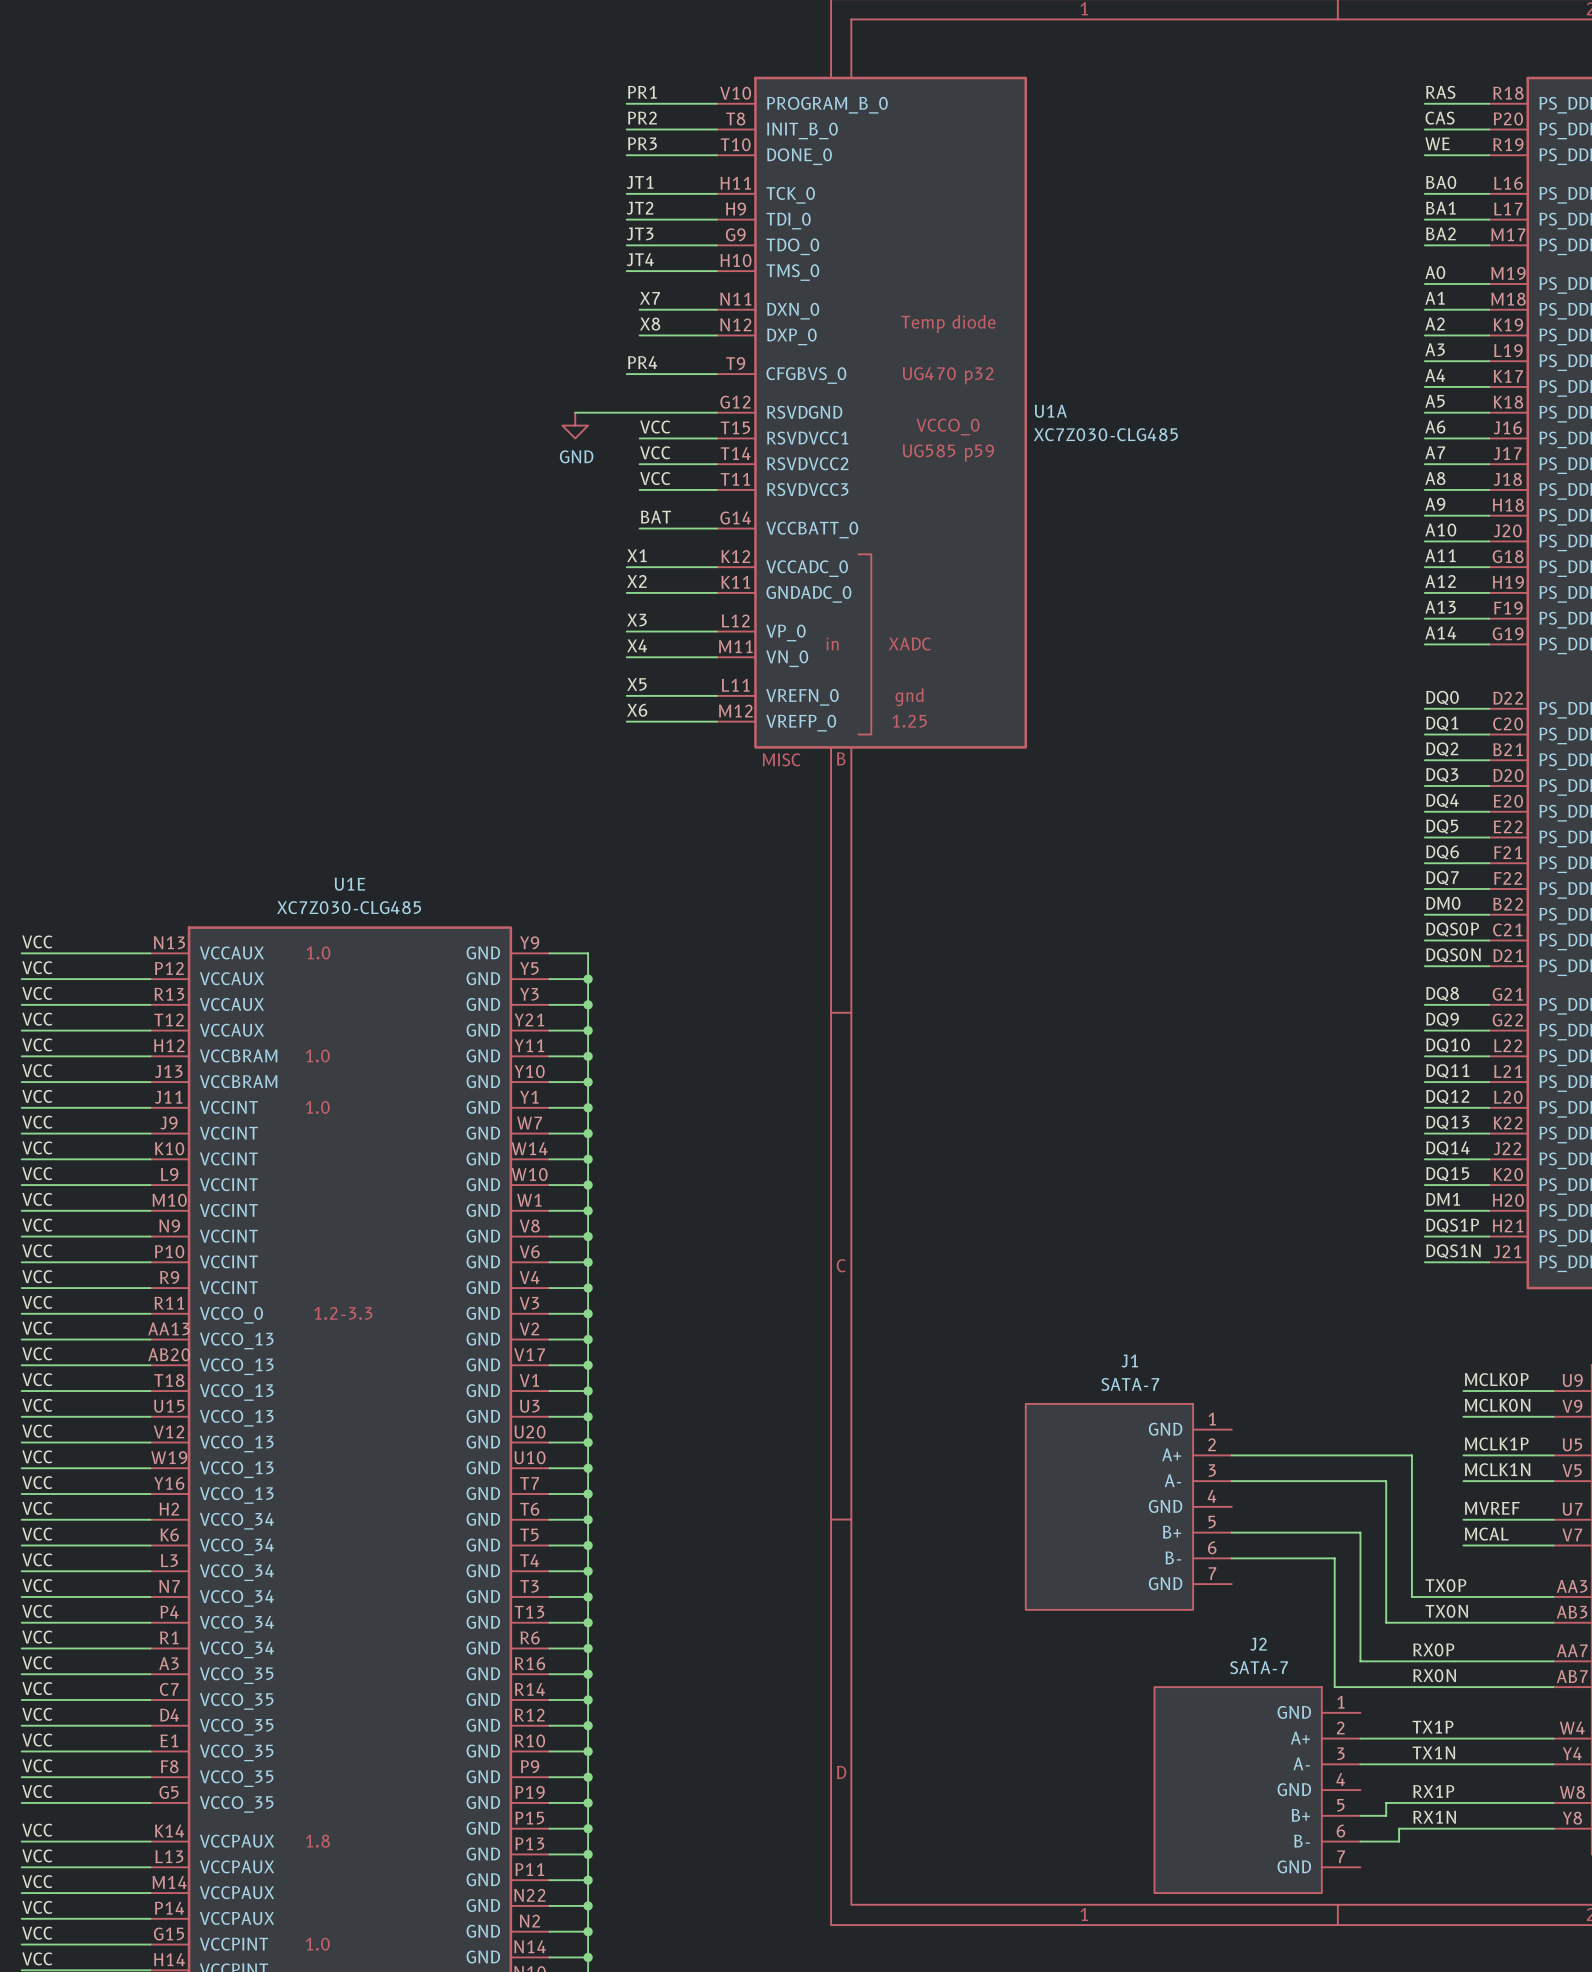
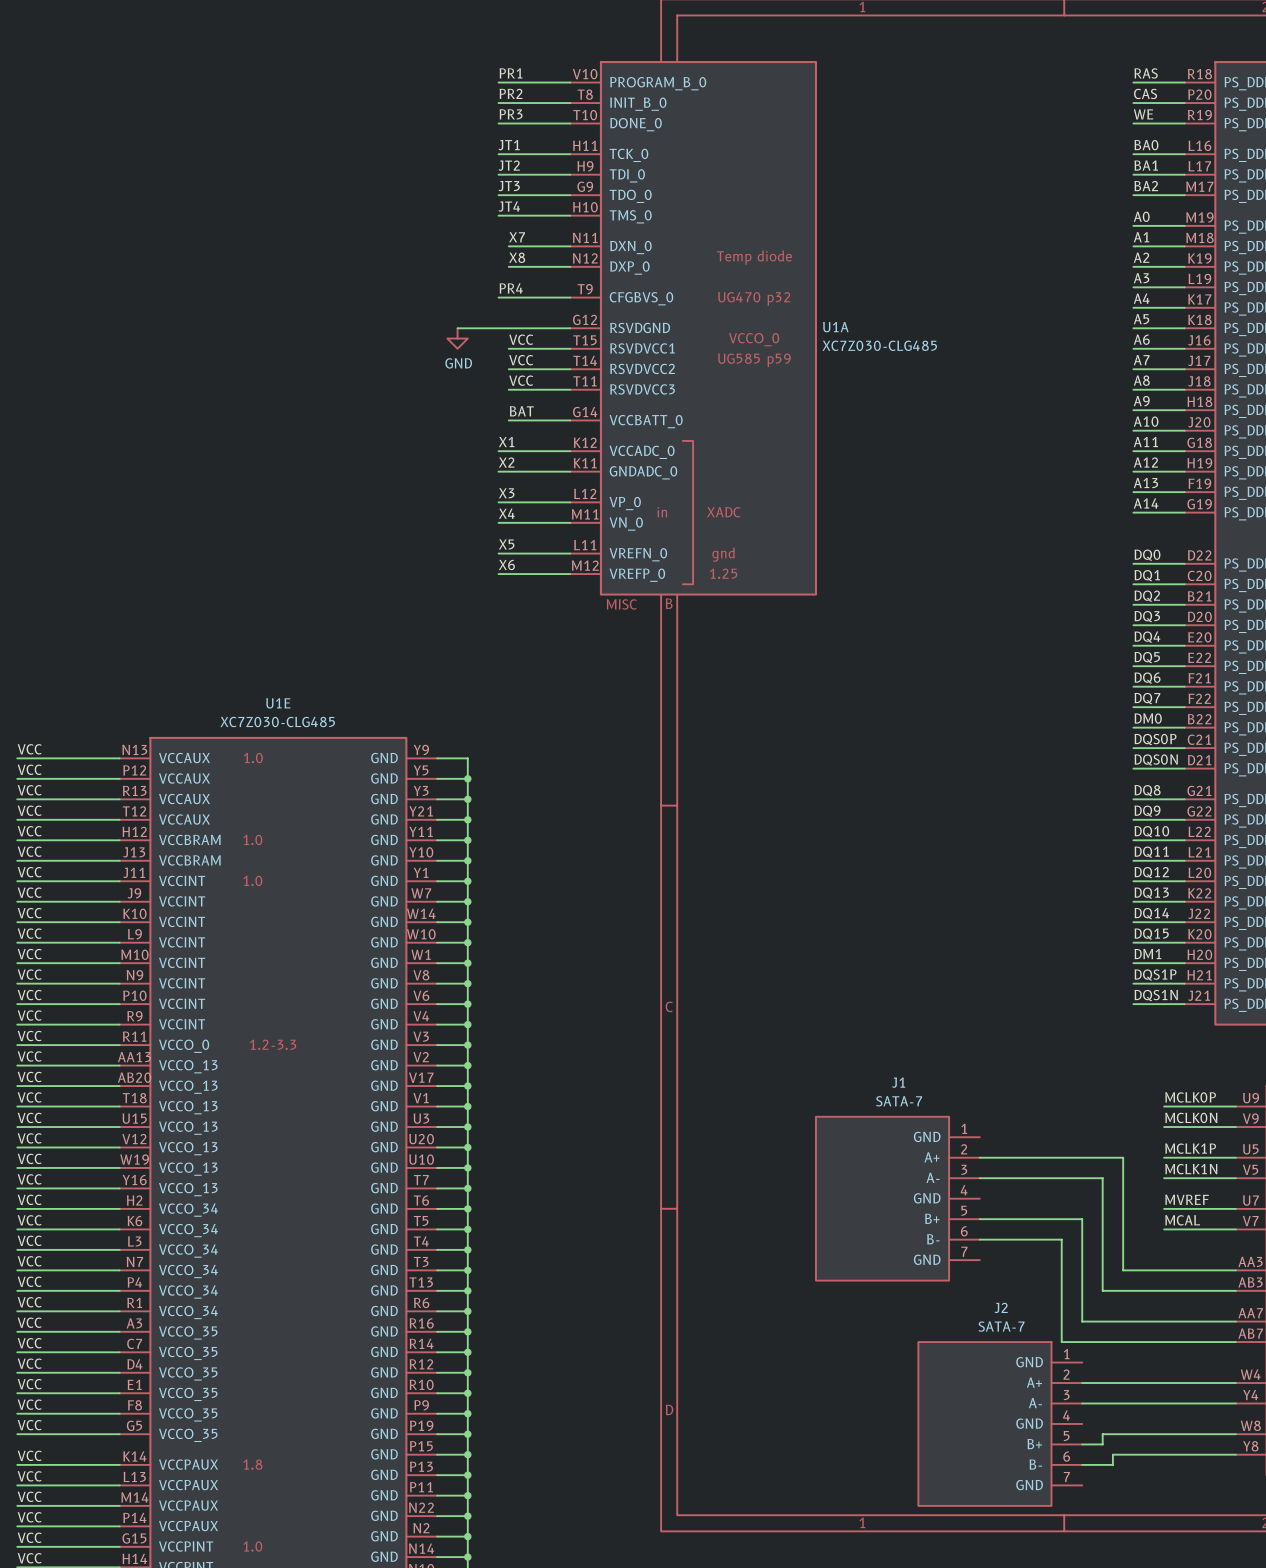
label: TX0P (1445, 1585) -> none
label: TX0N (1446, 1611) -> none
label: RX0P (1433, 1649) -> none
label: RX0N (1434, 1675) -> none
label: TX1P (1432, 1727) -> none
label: TX1N (1433, 1752) -> none
label: RX1P (1433, 1791) -> none
label: RX1N (1434, 1817) -> none

